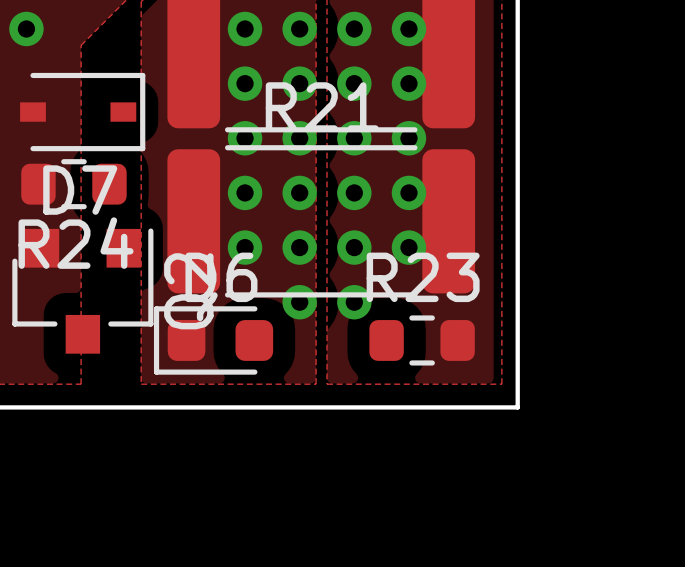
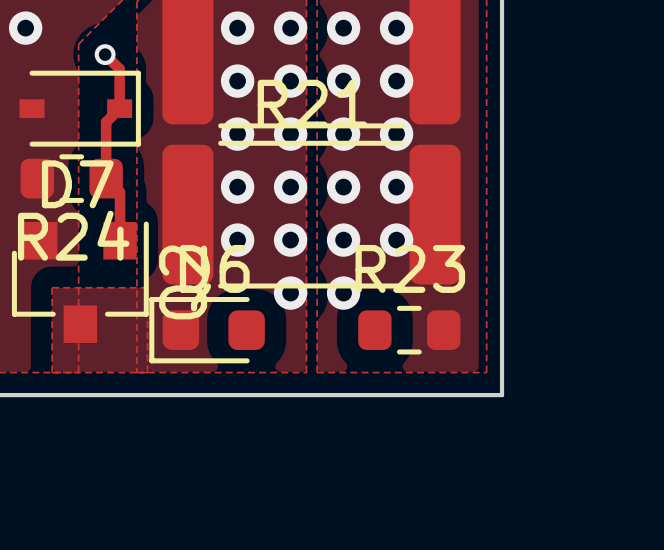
track: none -> (105, 54) (119, 69) (119, 108) (106, 122) (106, 178) (120, 192) (120, 240)
via: none -> (105, 54)
zone outline: none -> (52, 372) (52, 287) (147, 287) (147, 372)
zone outline: none -> (78, 372) (136, 372)

